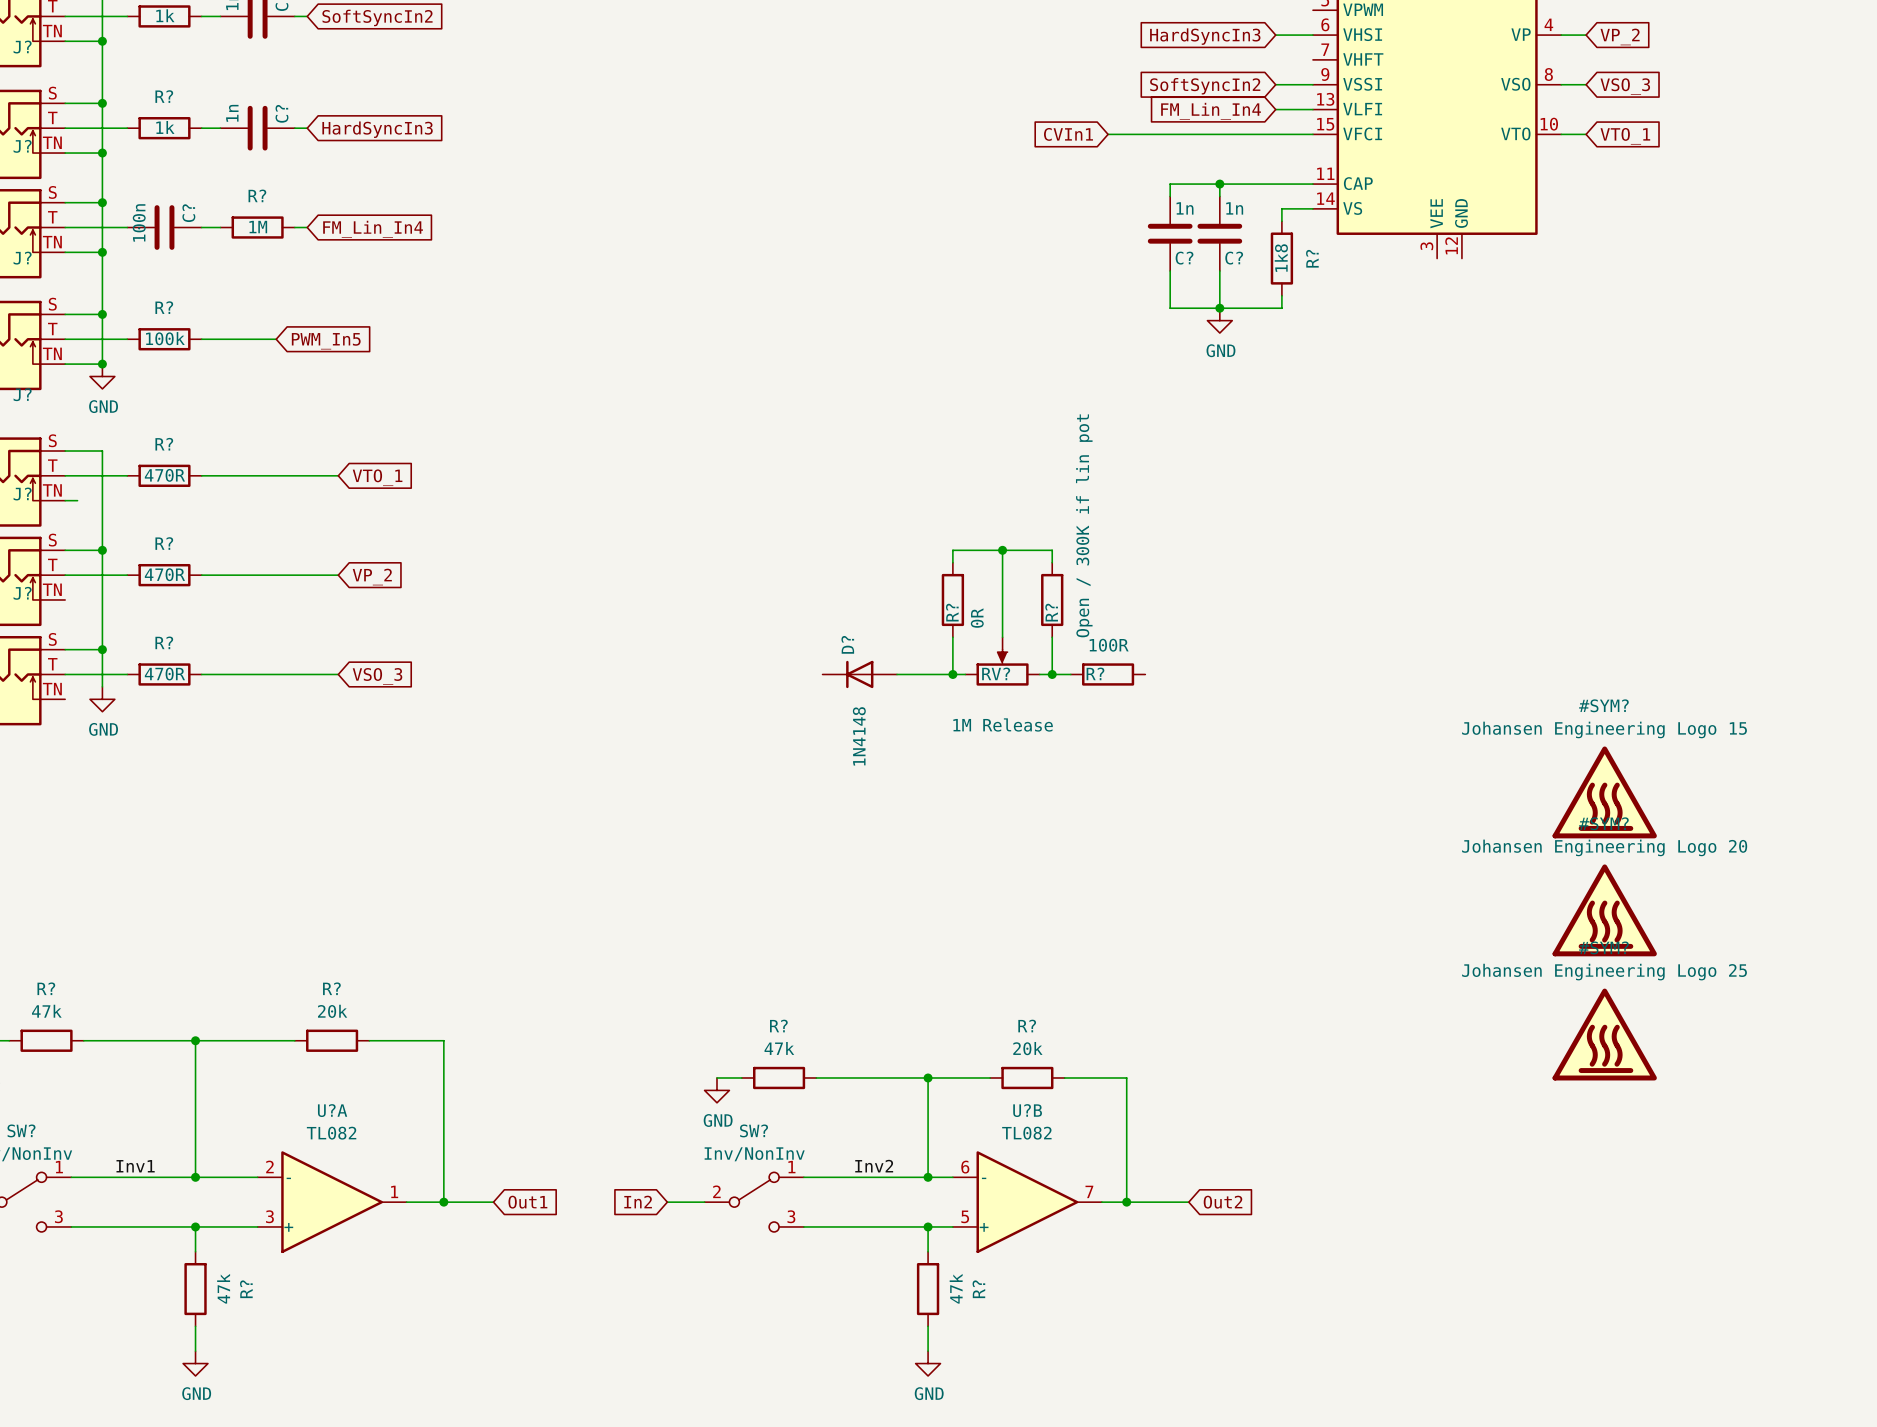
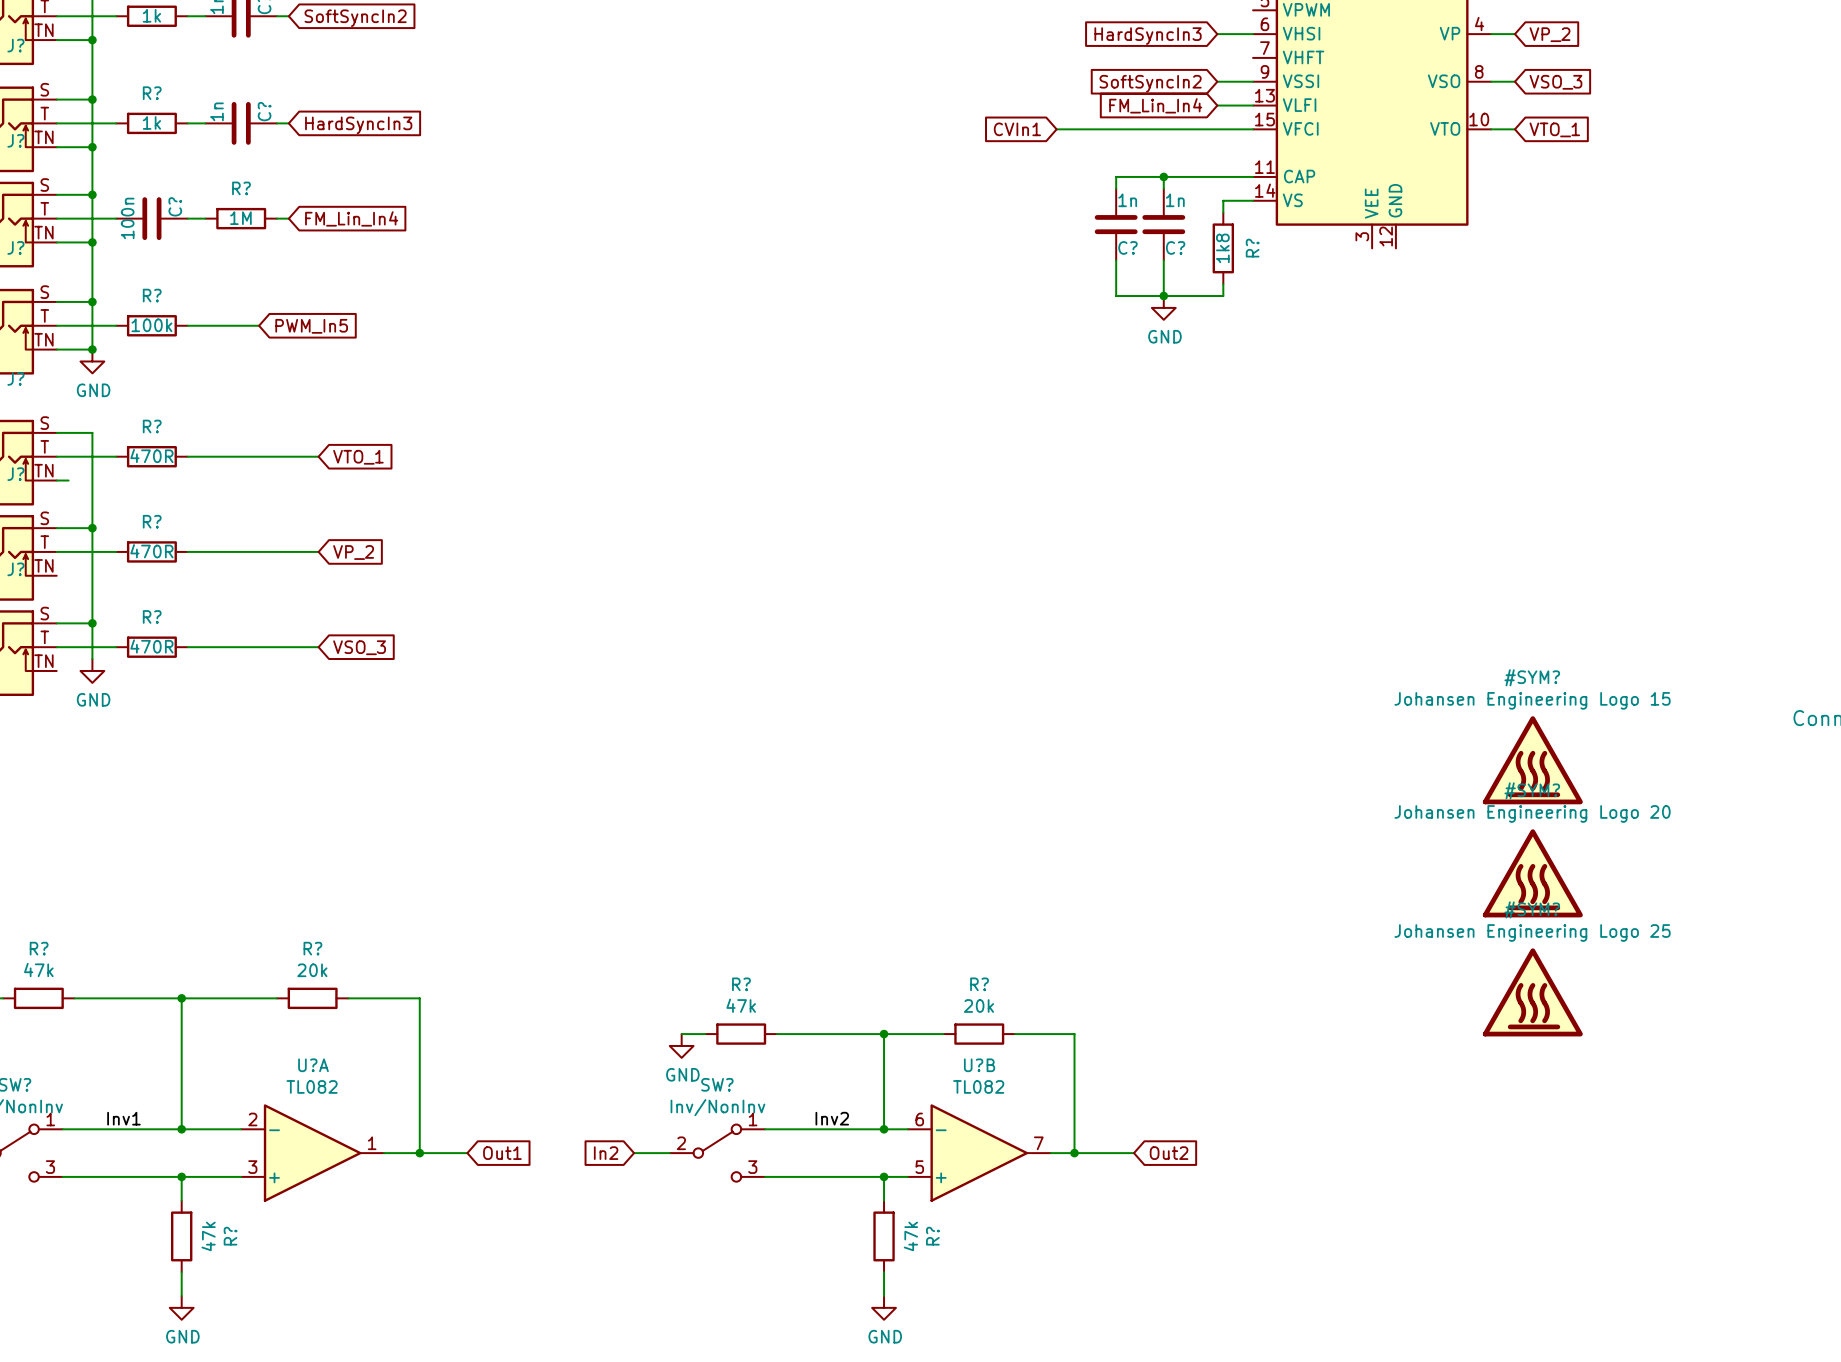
wire: (1002, 550) (1002, 637) -> none
junction: (1002, 550) -> none
wire: (952, 562) (952, 550) (1052, 550) (1052, 562) -> none
R?: 0R (952, 599) -> none
R?: Open / 300K if lin pot (1052, 599) -> none
wire: (952, 637) (952, 674) -> none
wire: (1052, 637) (1052, 674) -> none
RV?: 1M Release (1002, 661) -> none
D?: 1N4148 (859, 674) -> none
wire: (897, 674) (965, 674) -> none
junction: (952, 674) -> none
wire: (1039, 674) (1070, 674) -> none
junction: (1052, 674) -> none
R?: 100R (1108, 674) -> none

